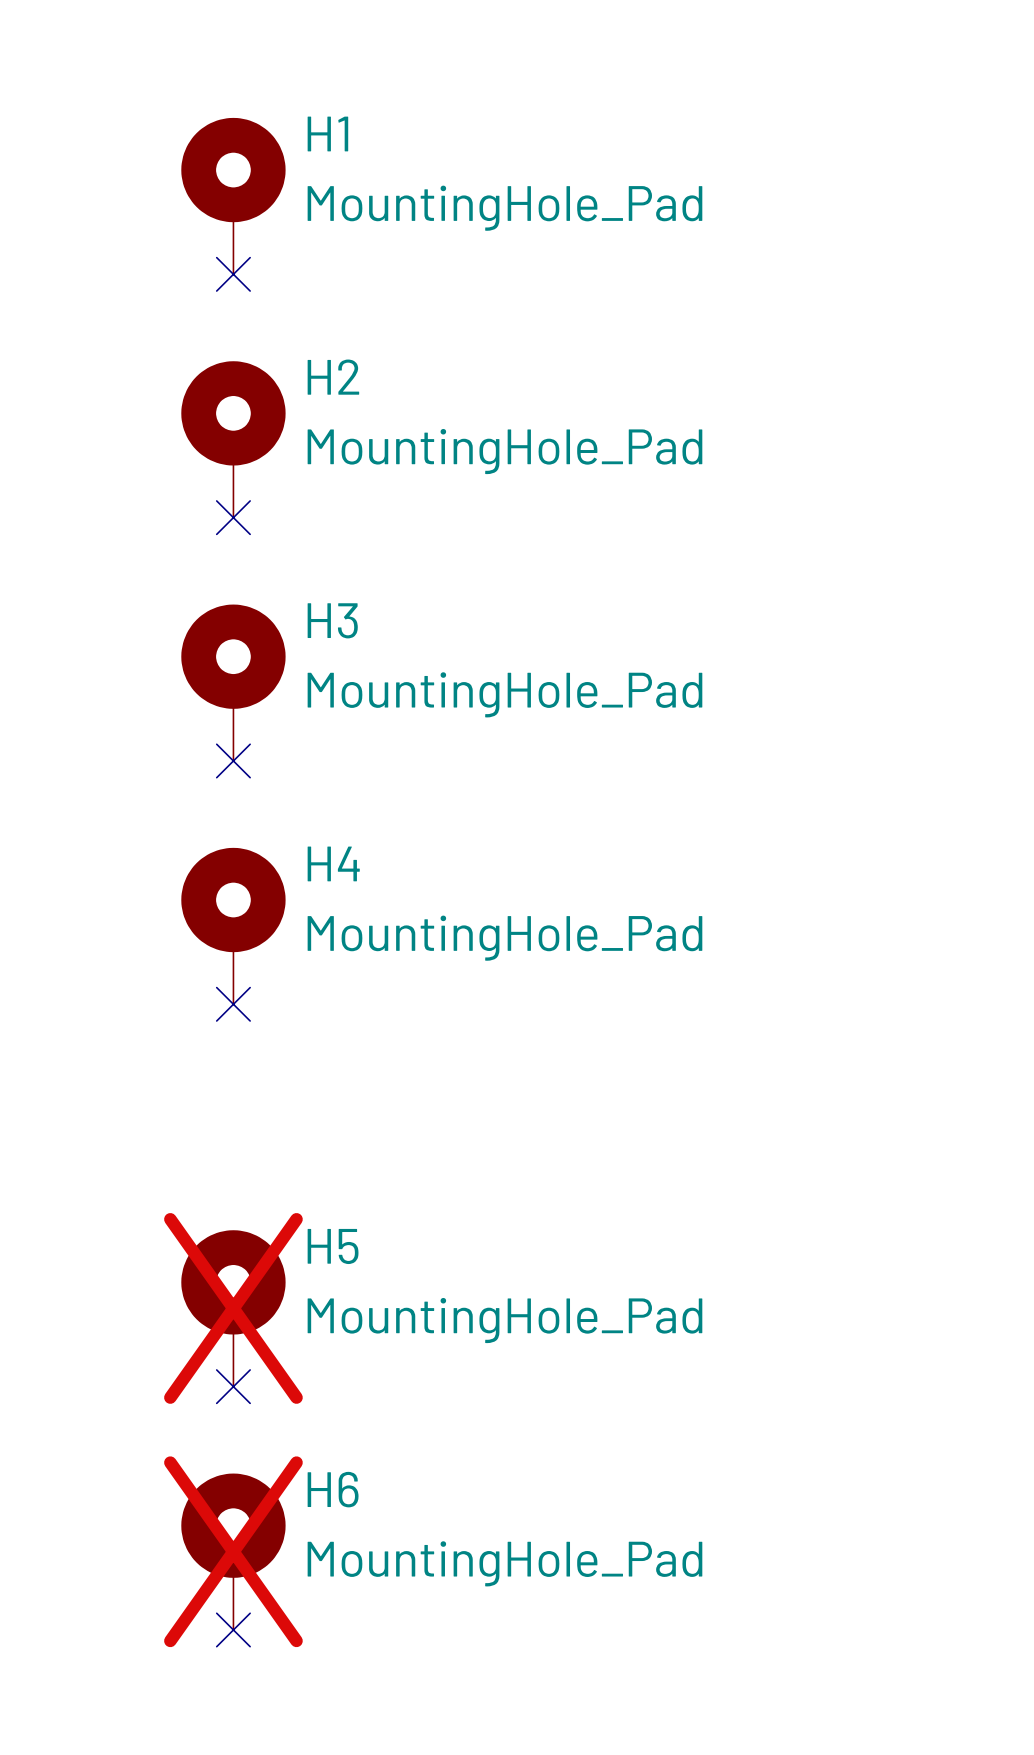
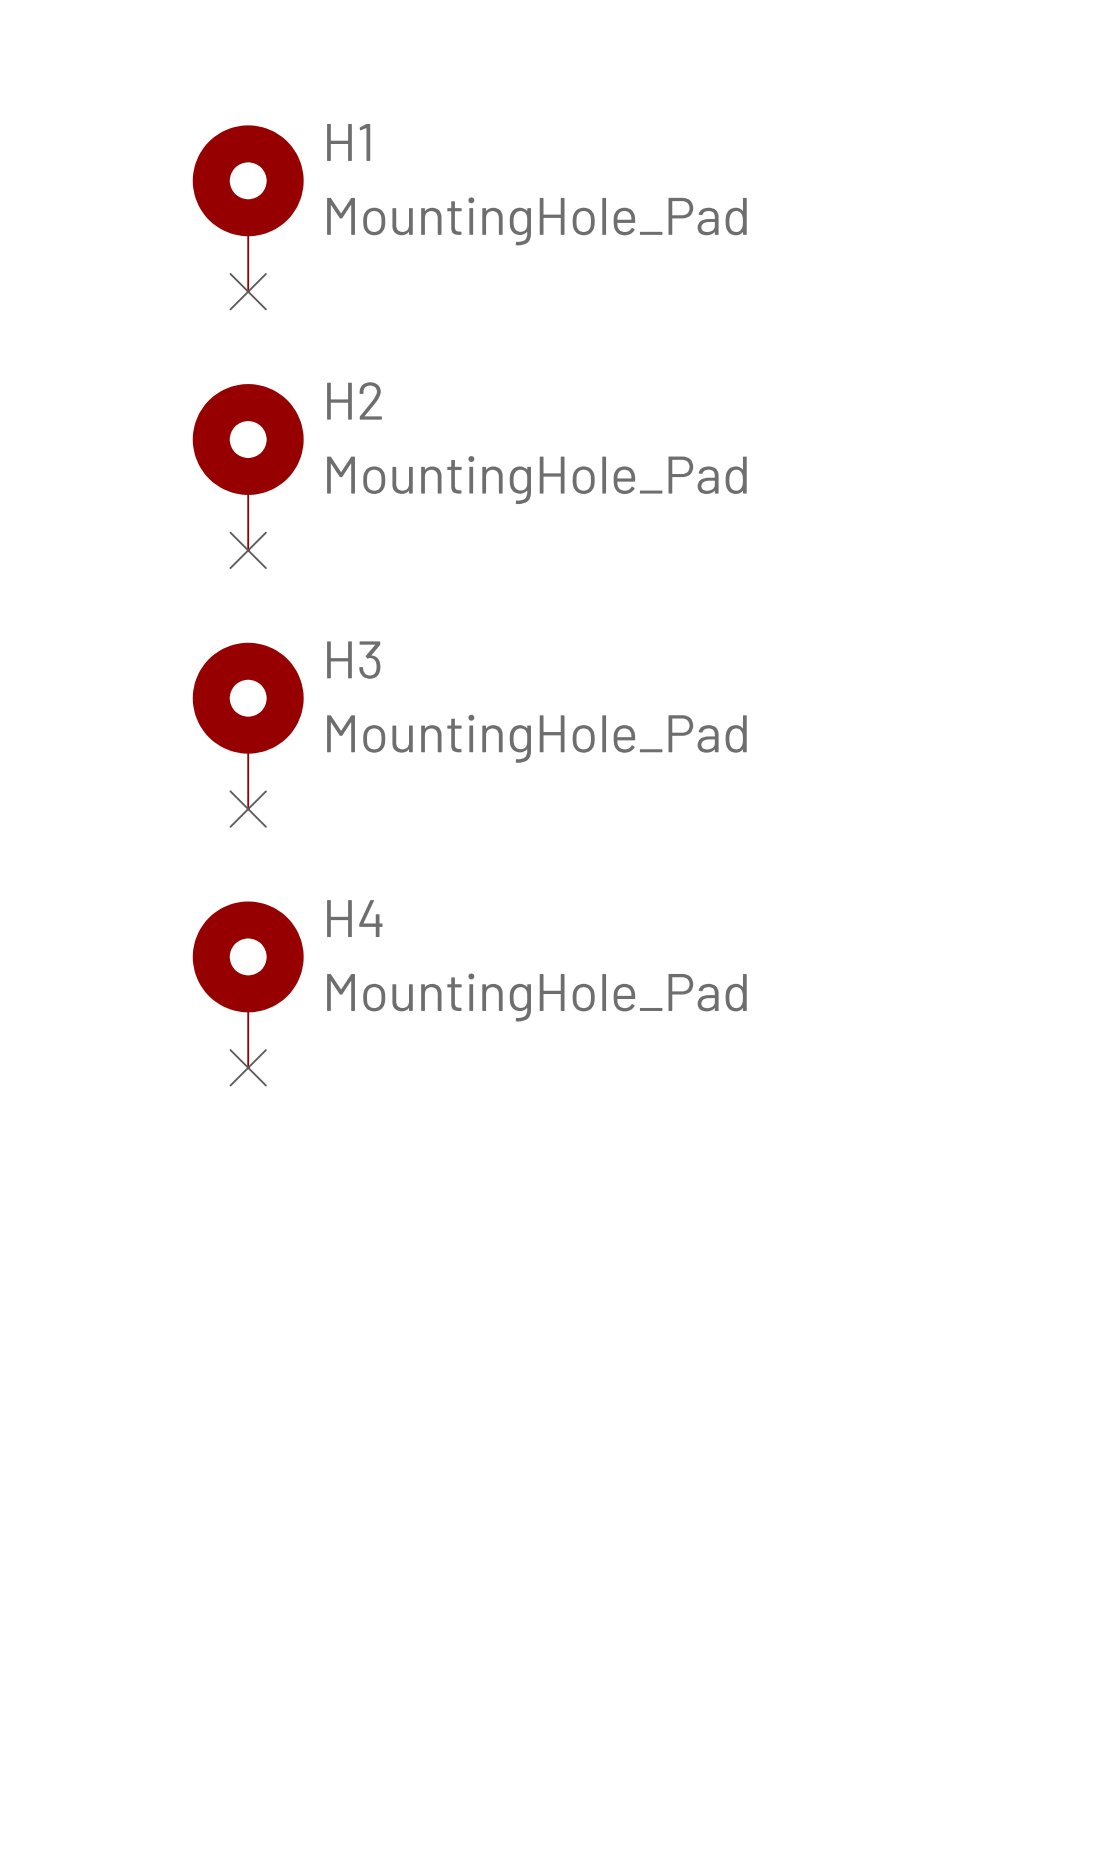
H5: MountingHole_Pad (233, 1308) -> none
no-connect mark: (233, 1386) -> none
H6: MountingHole_Pad (233, 1551) -> none
no-connect mark: (233, 1629) -> none

